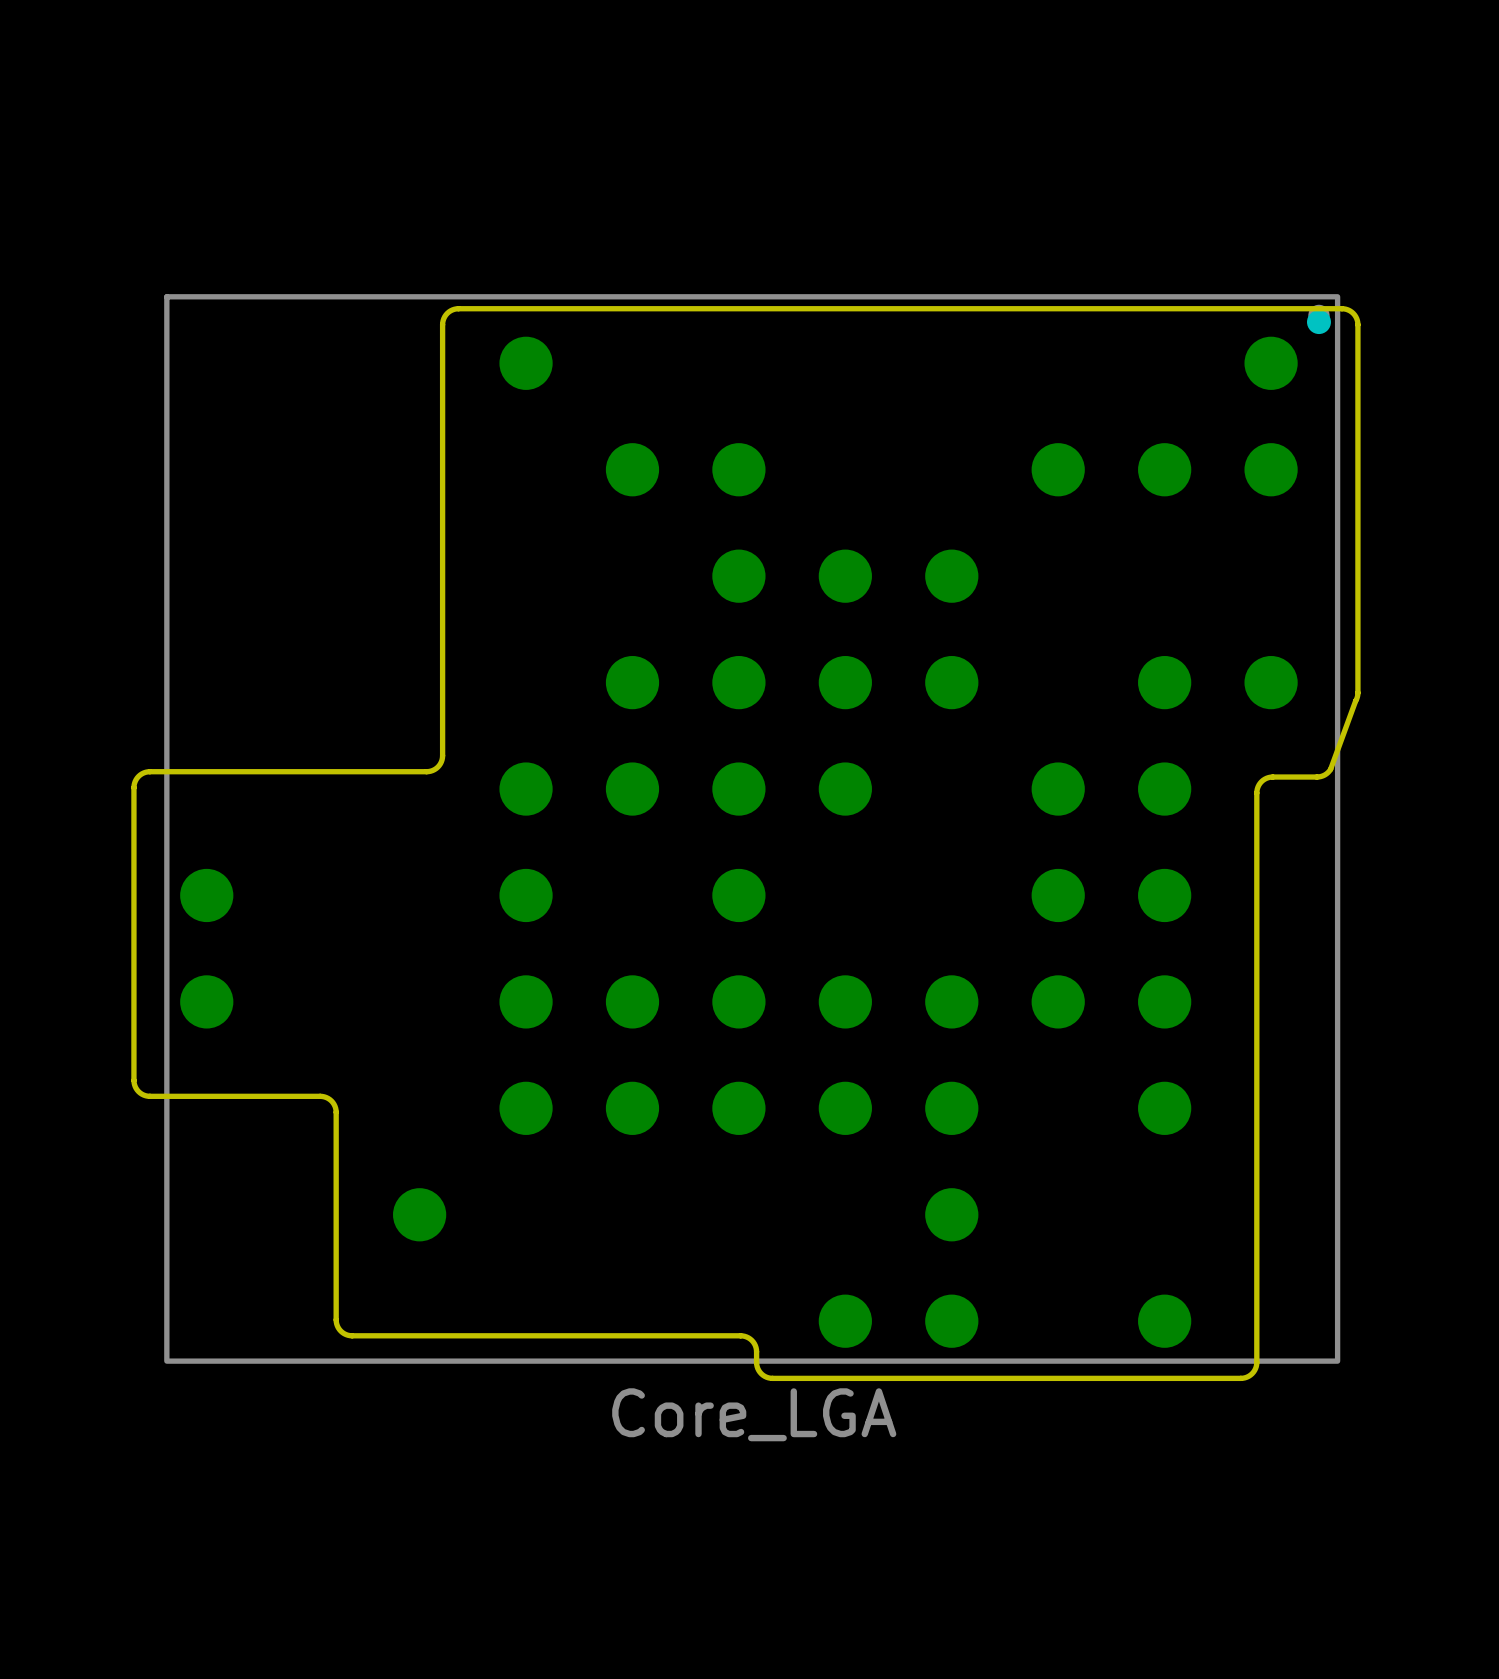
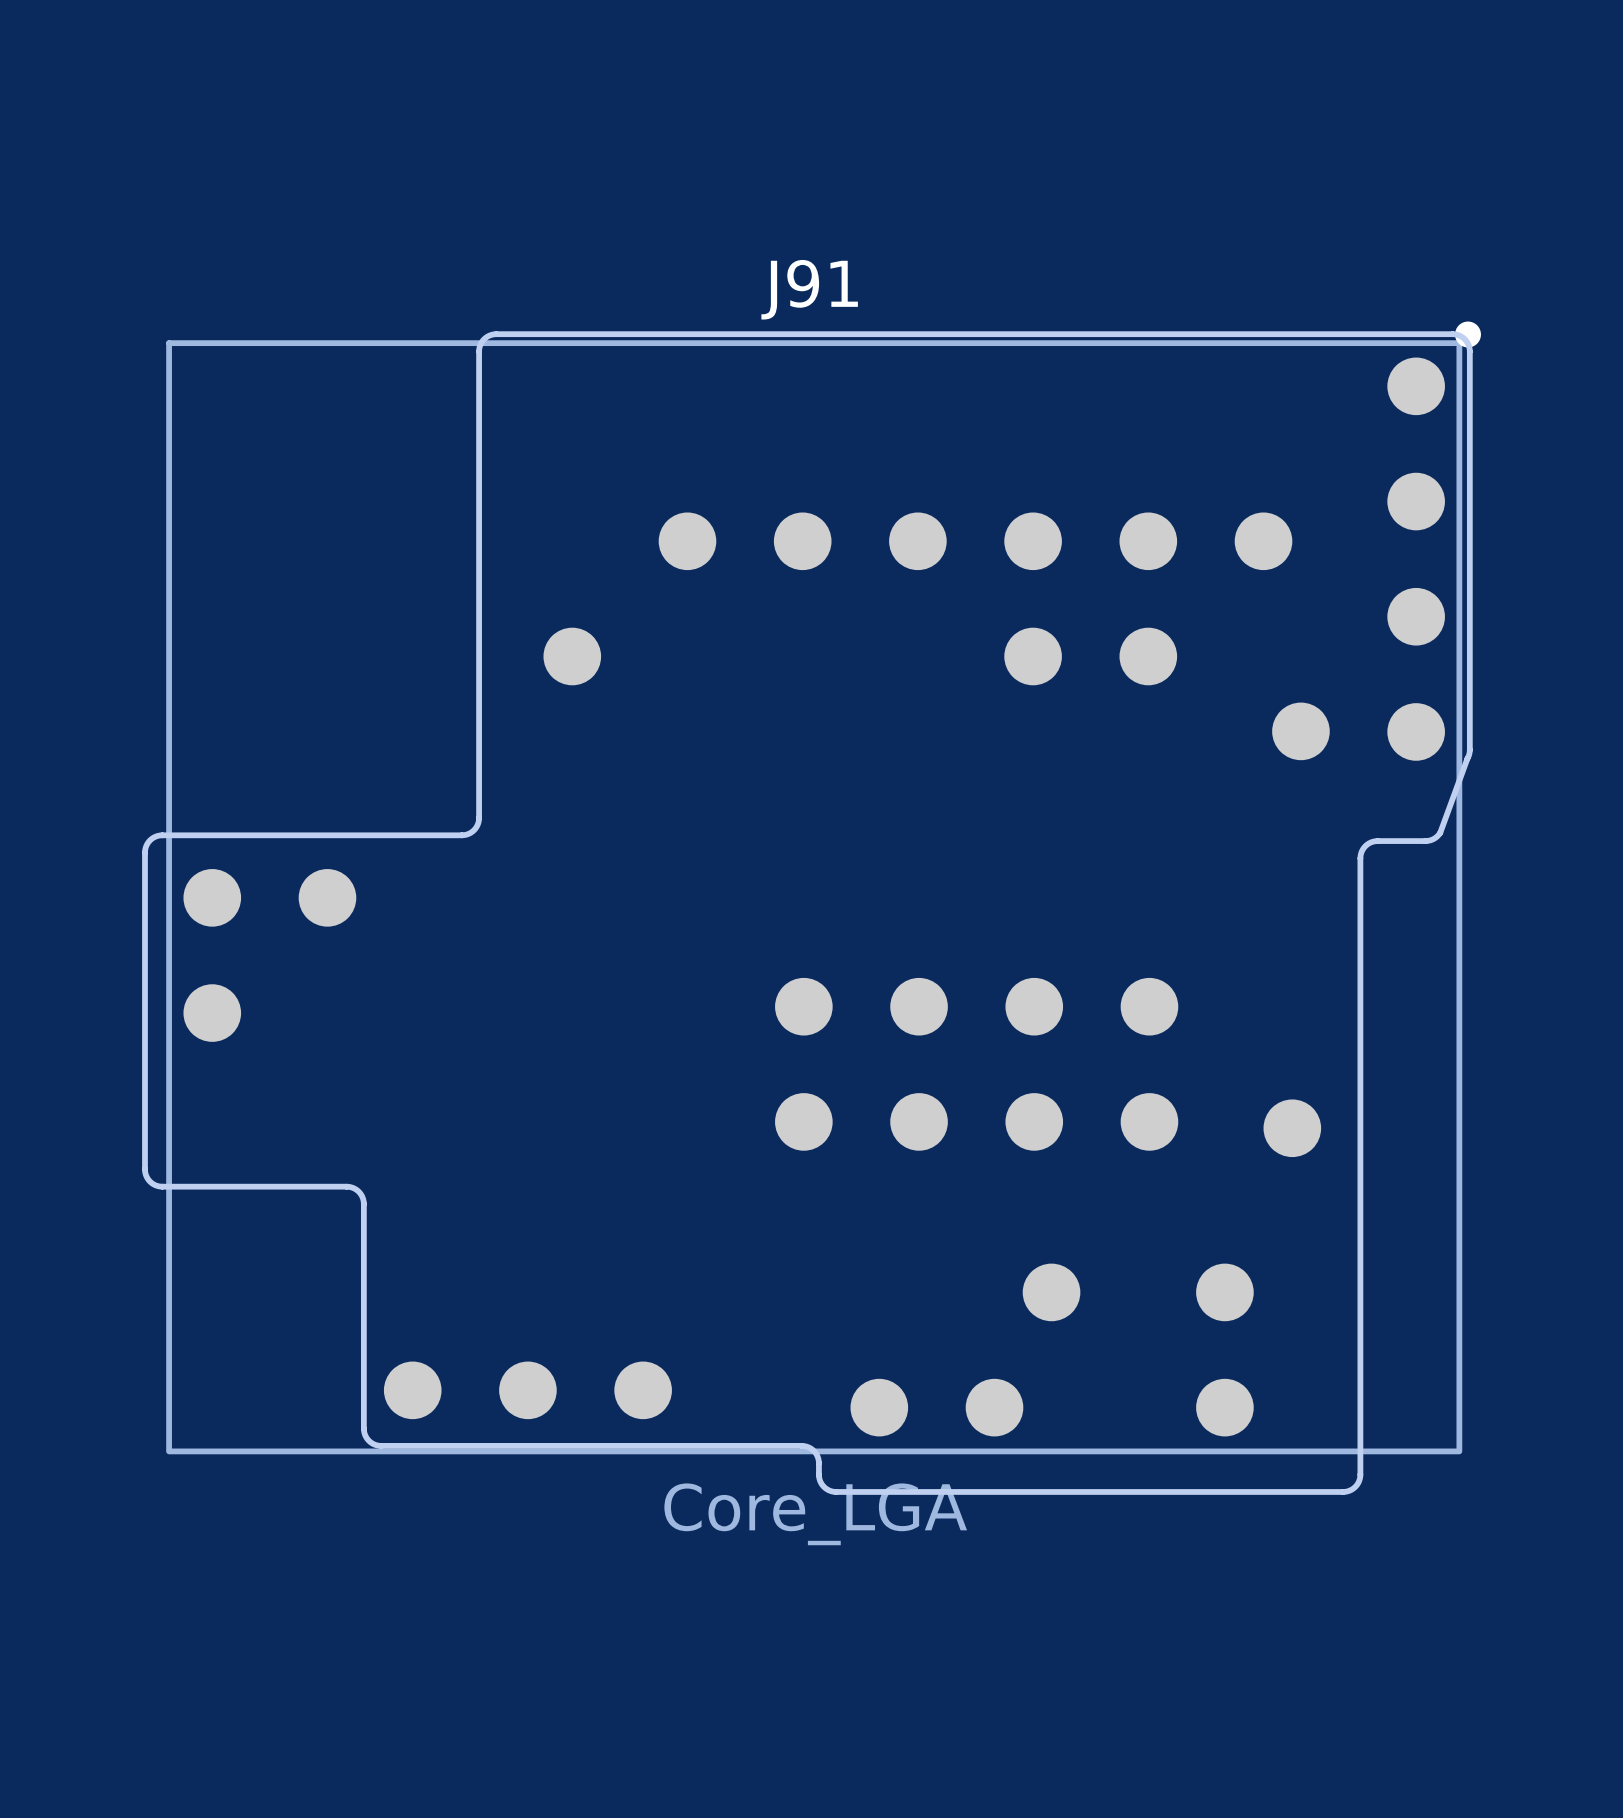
J91: none -> Core_LGA (823, 887)
part: Core_LGA (752, 828) -> none

